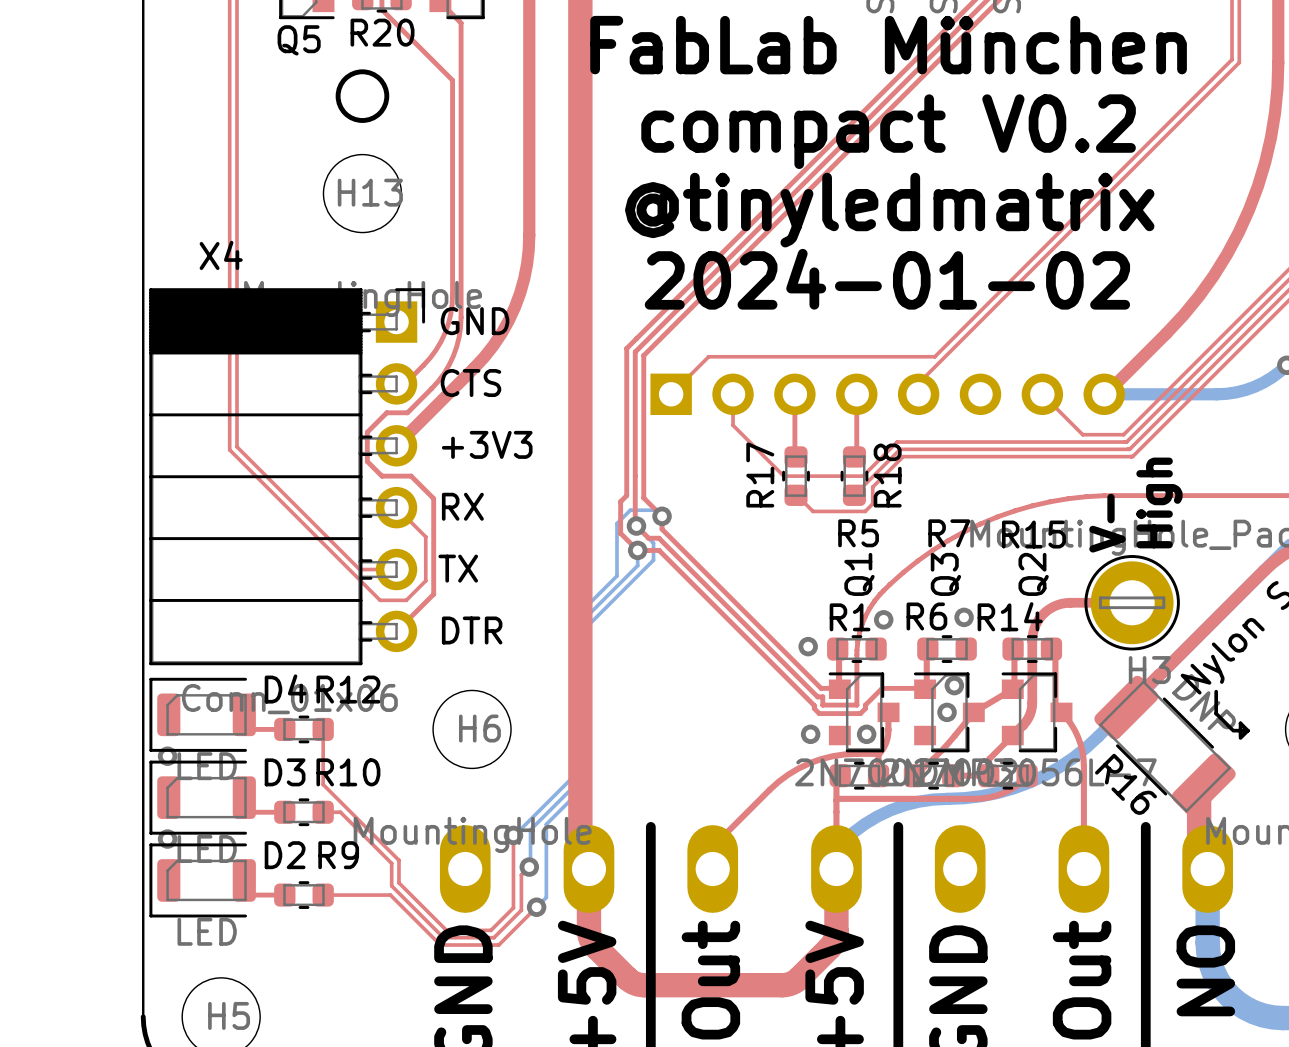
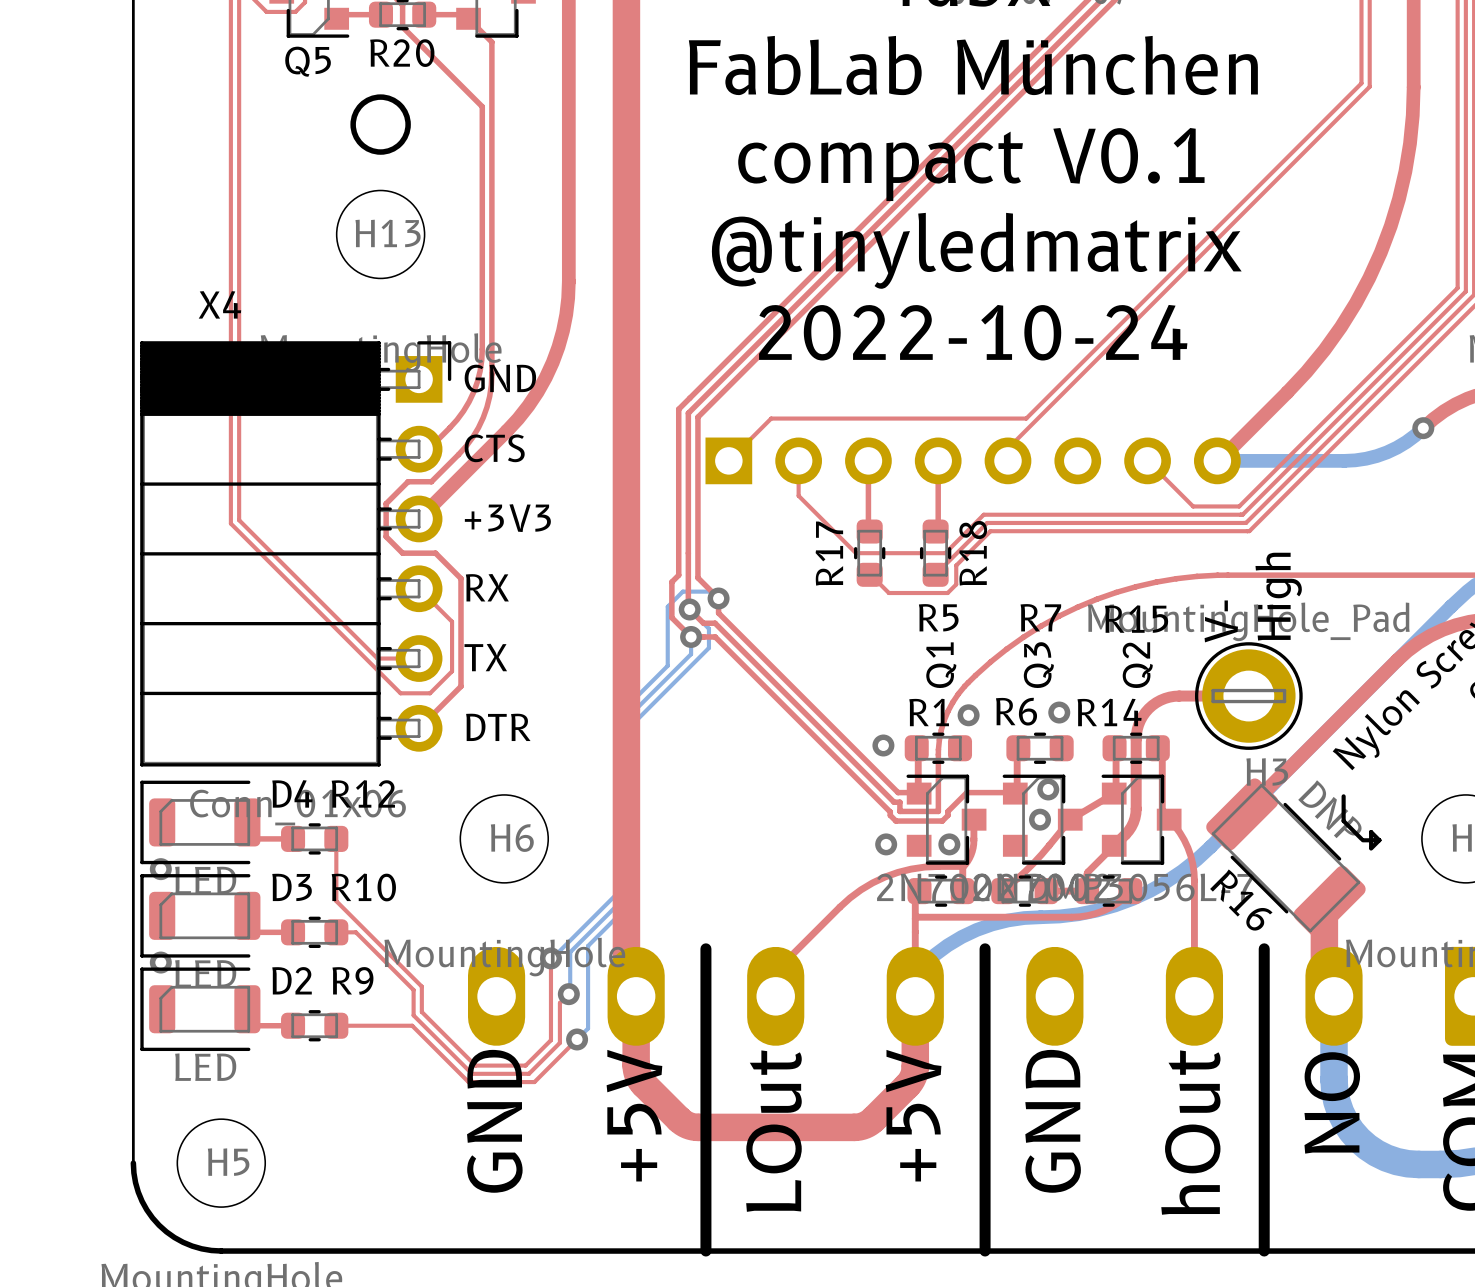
text: compact V0.2 (888, 131) -> compact V0.1 (971, 164)
text: 2024-01-02 (887, 279) -> 2022-10-24 (973, 332)

